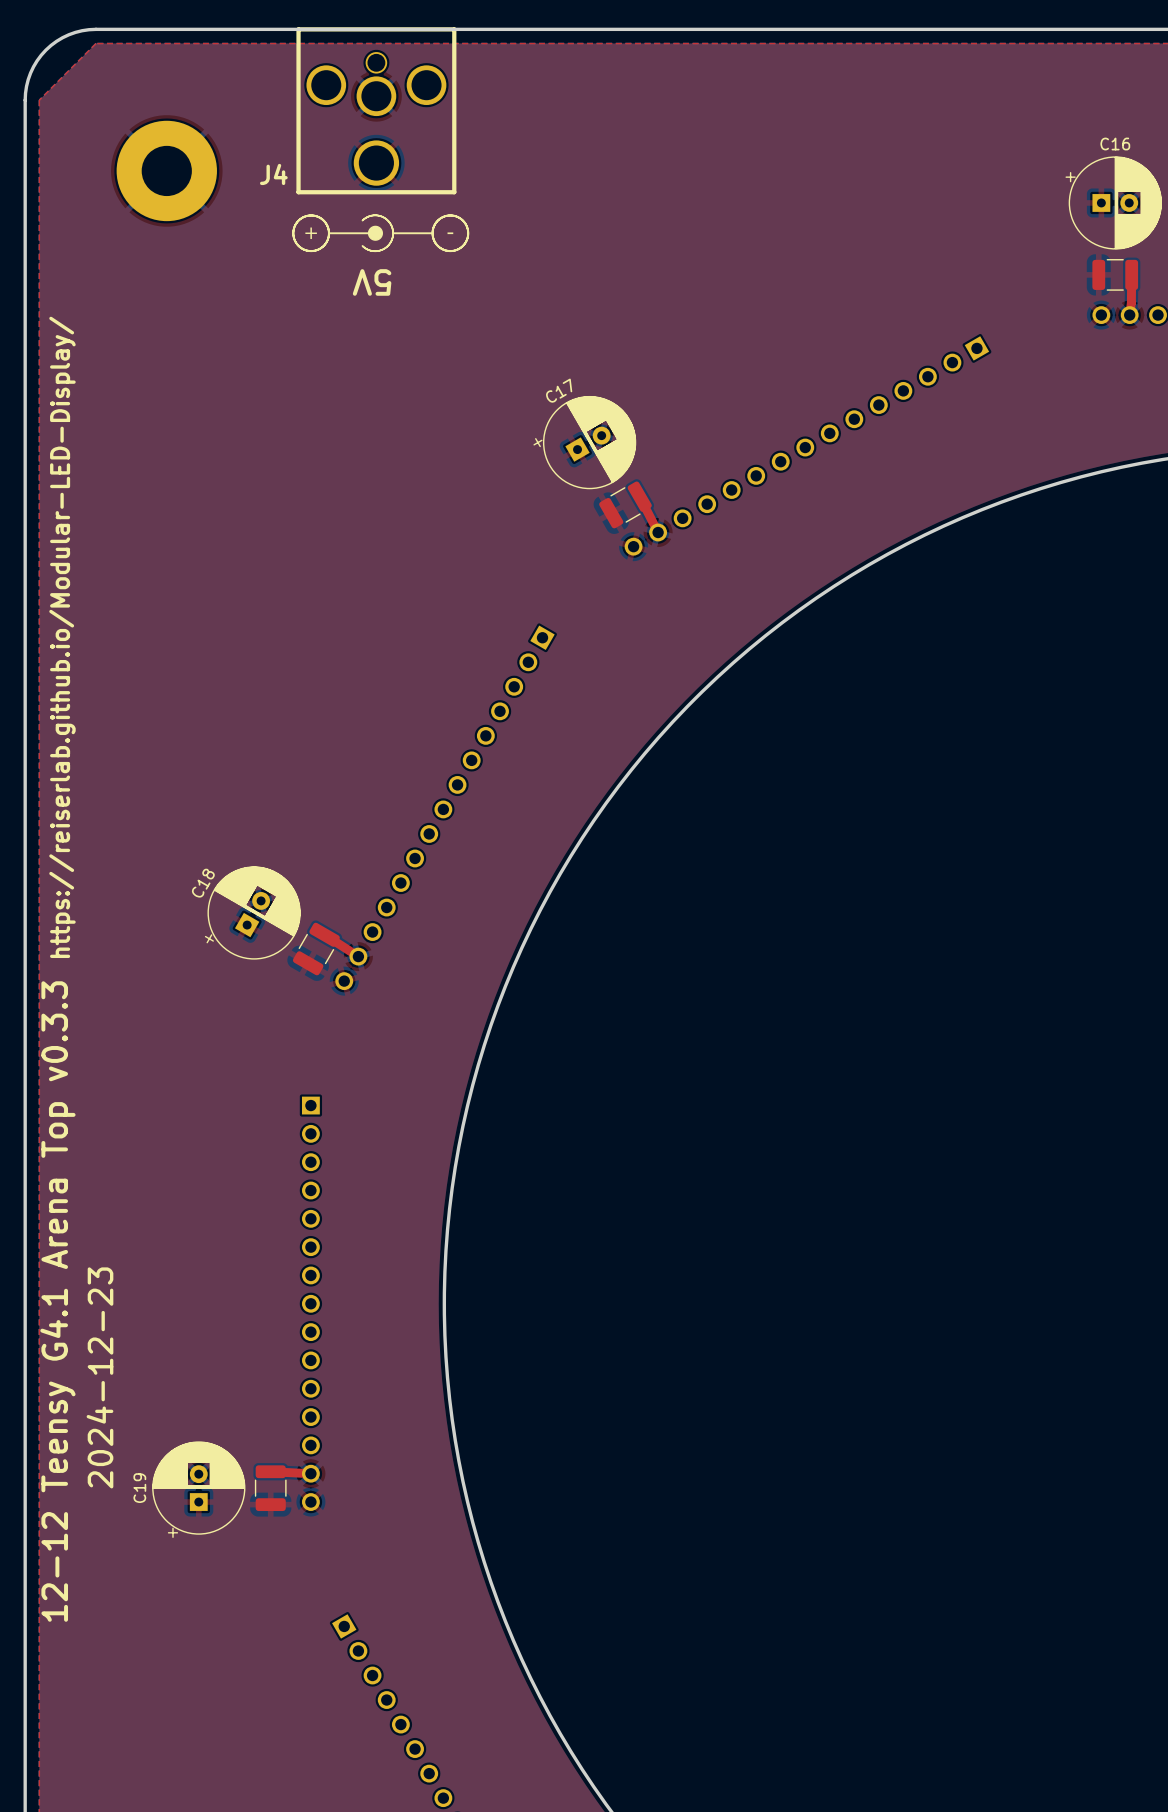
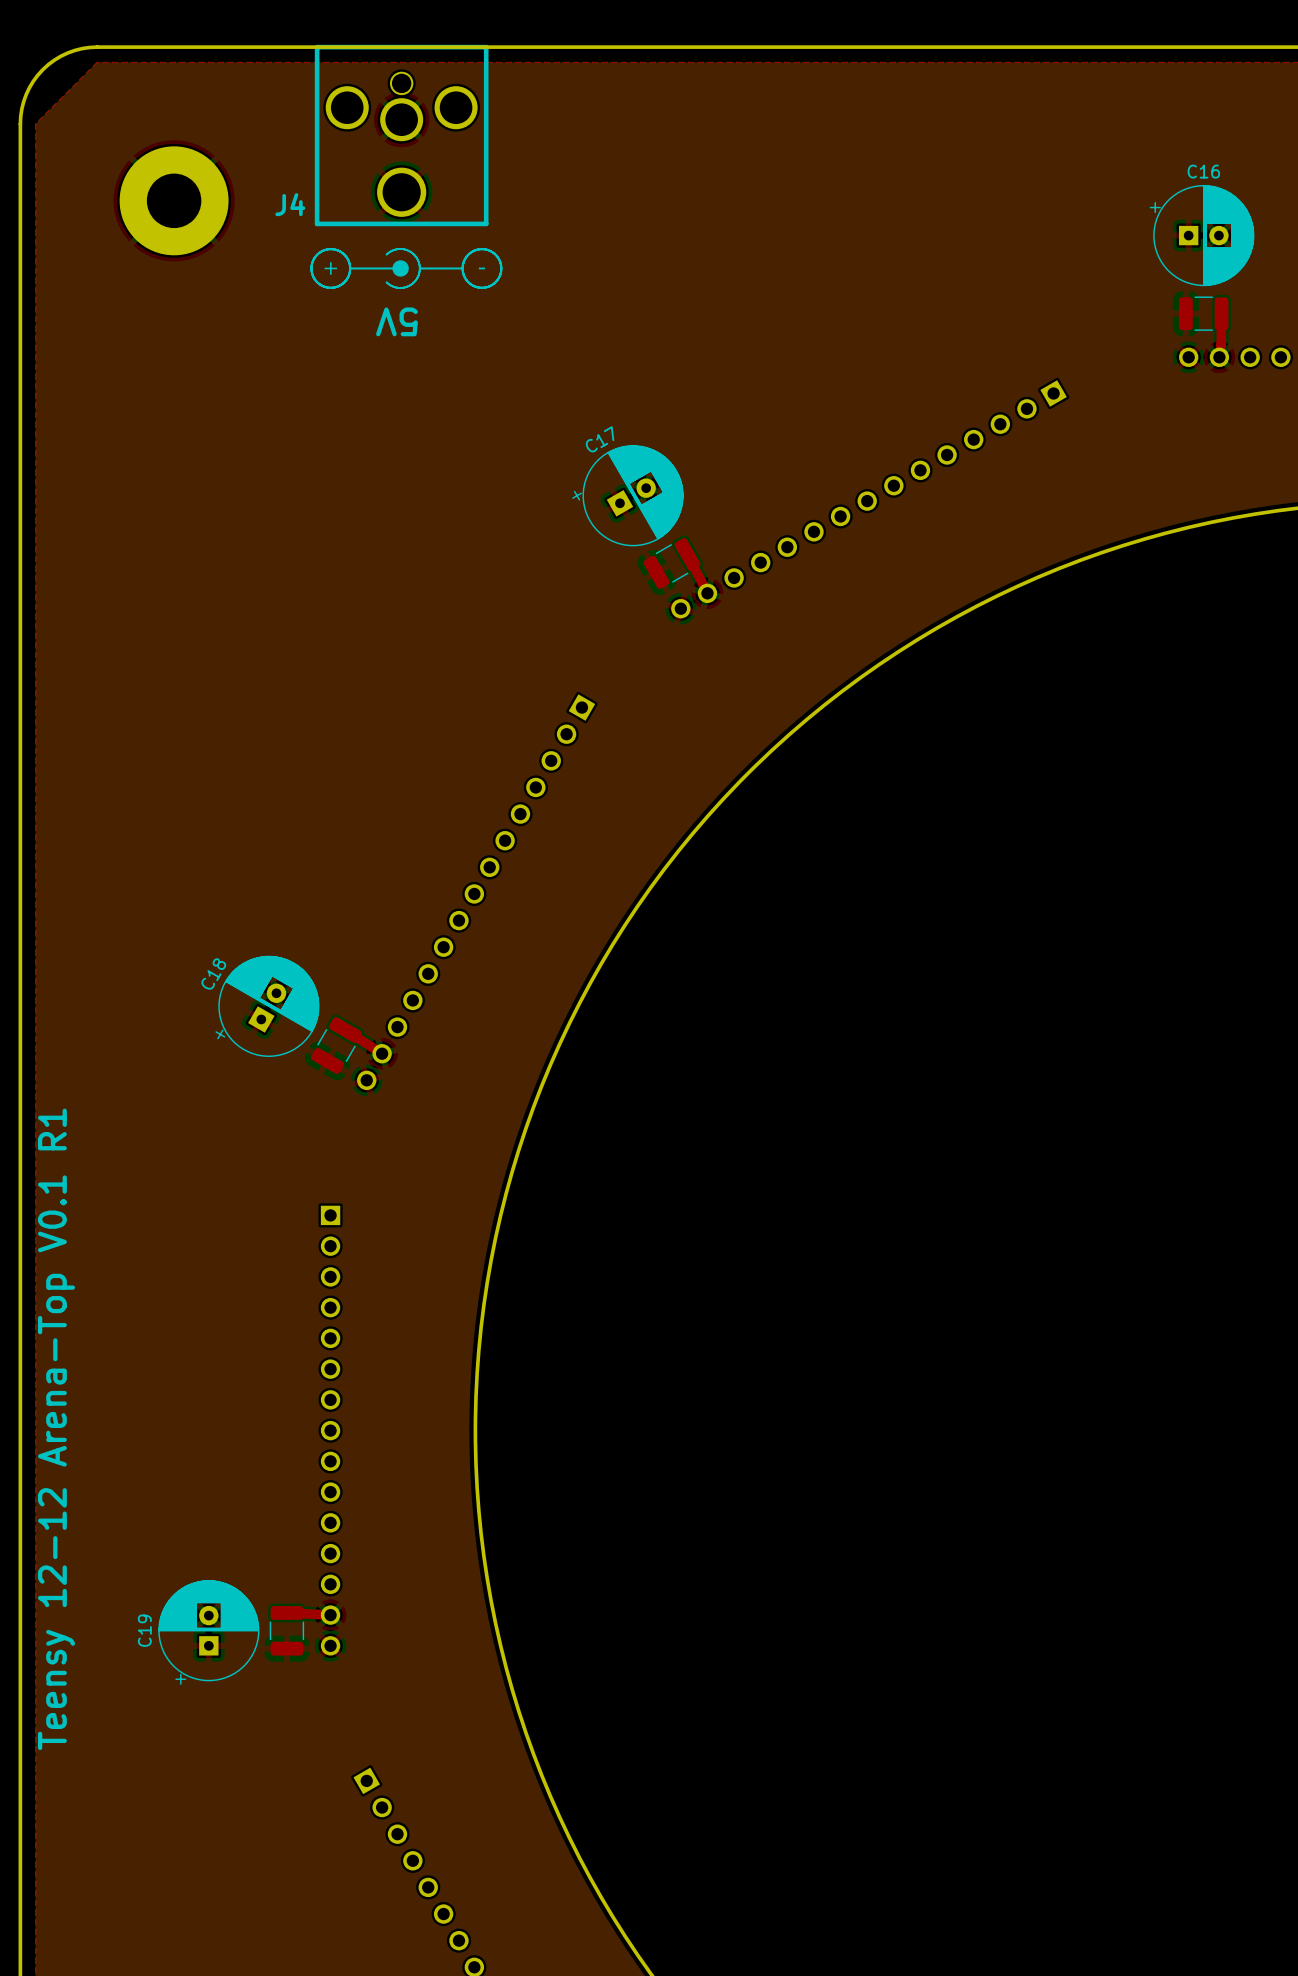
text: https://reiserlab.github.io/Modular-LED-Display/ (62, 637) -> none
text: 12-12 Teensy G4.1 Arena Top v0.3.3 (57, 1301) -> Teensy 12-12 Arena-Top V0.1 R1 (56, 1429)
text: 2024-12-23 (99, 1377) -> none

